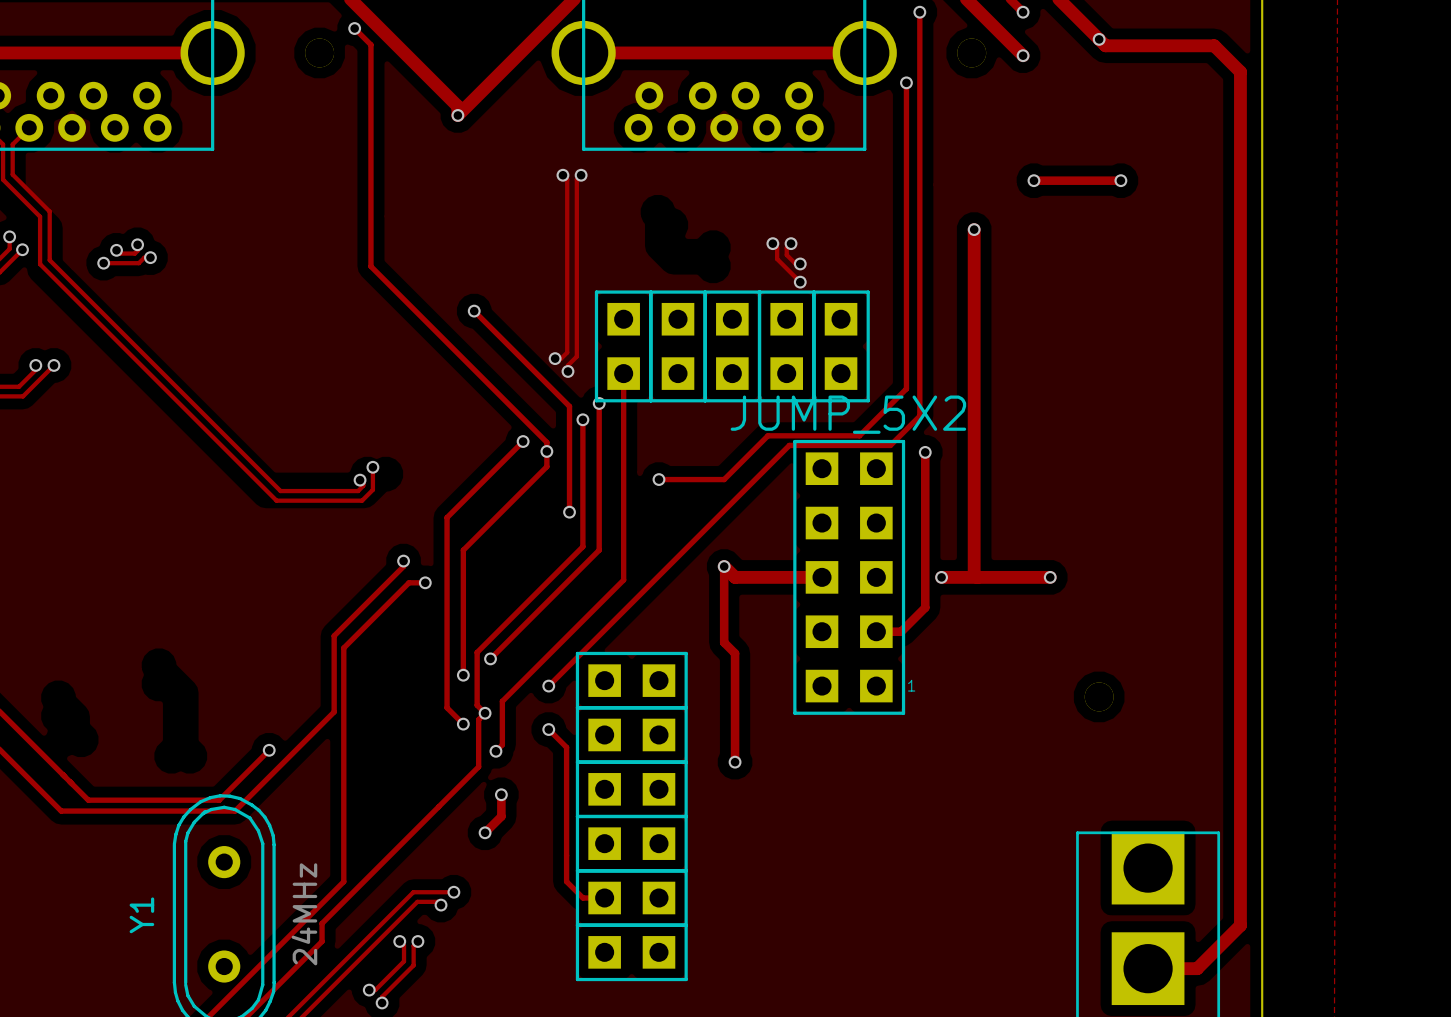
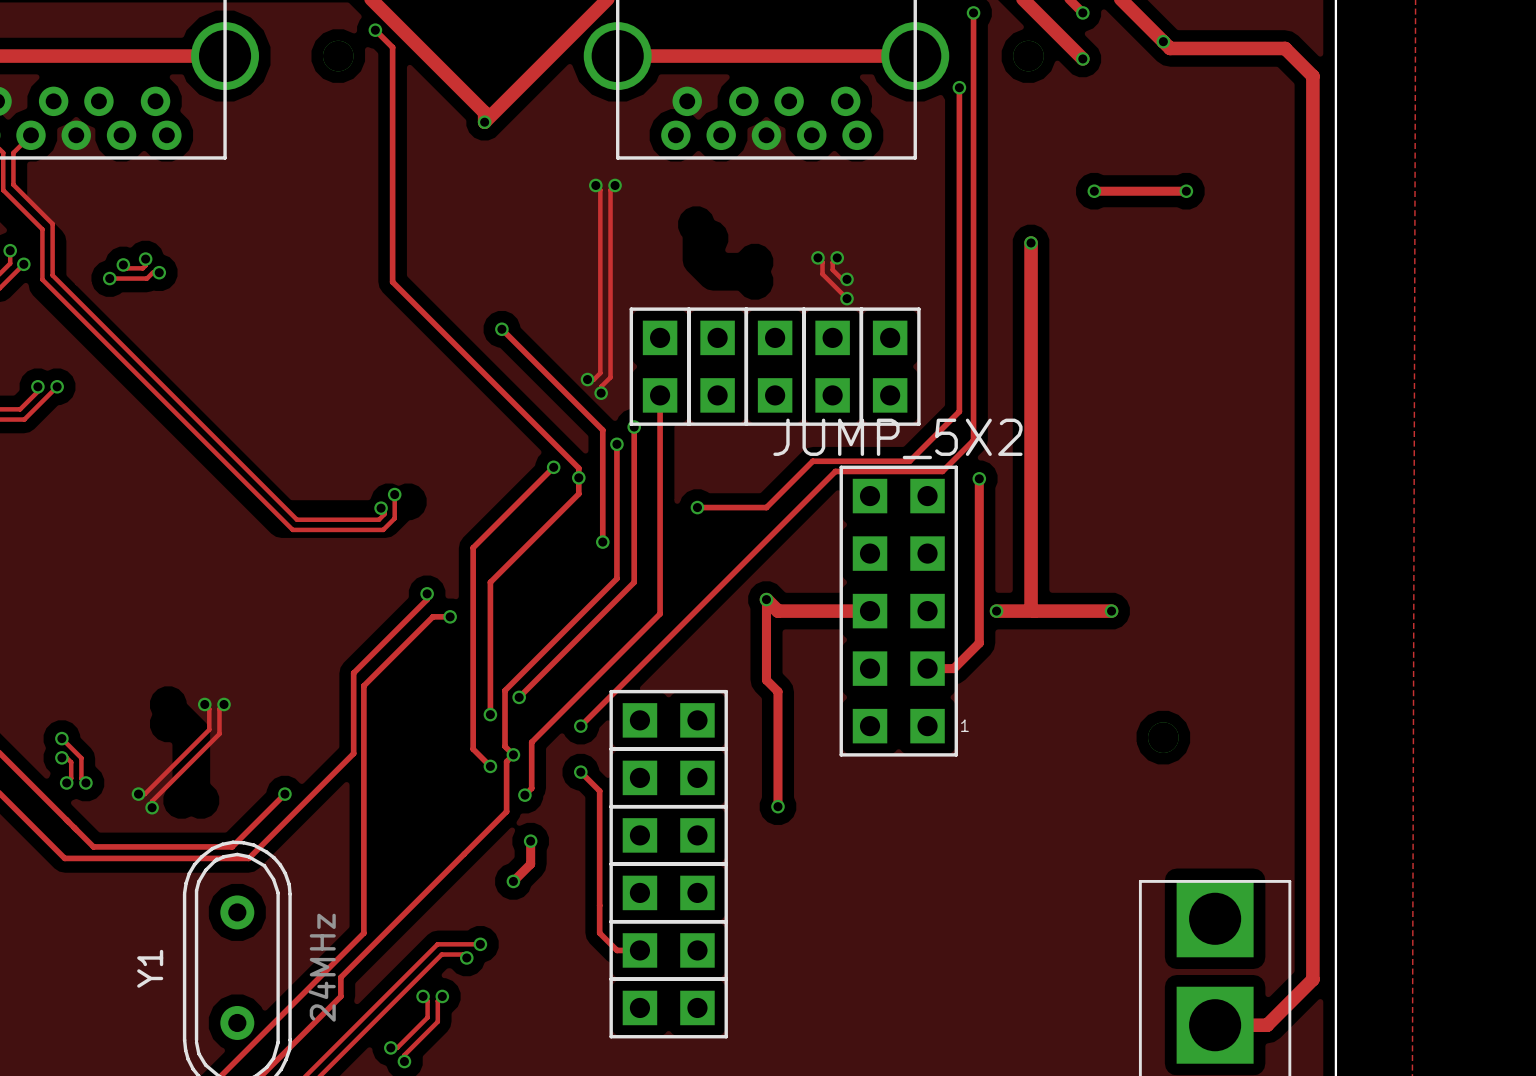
track: none -> (204, 704) (209, 709) (209, 729) (144, 794) (138, 794)
via: none -> (204, 704)
track: none -> (224, 704) (219, 709) (219, 733) (152, 801) (152, 807)
via: none -> (224, 704)
track: none -> (61, 738) (81, 758) (81, 778) (85, 782)
via: none -> (61, 738)
track: none -> (61, 757) (66, 757) (71, 762) (71, 778) (66, 782)
via: none -> (61, 757)
via: none -> (66, 782)
via: none -> (85, 782)
via: none -> (138, 794)
via: none -> (152, 807)

